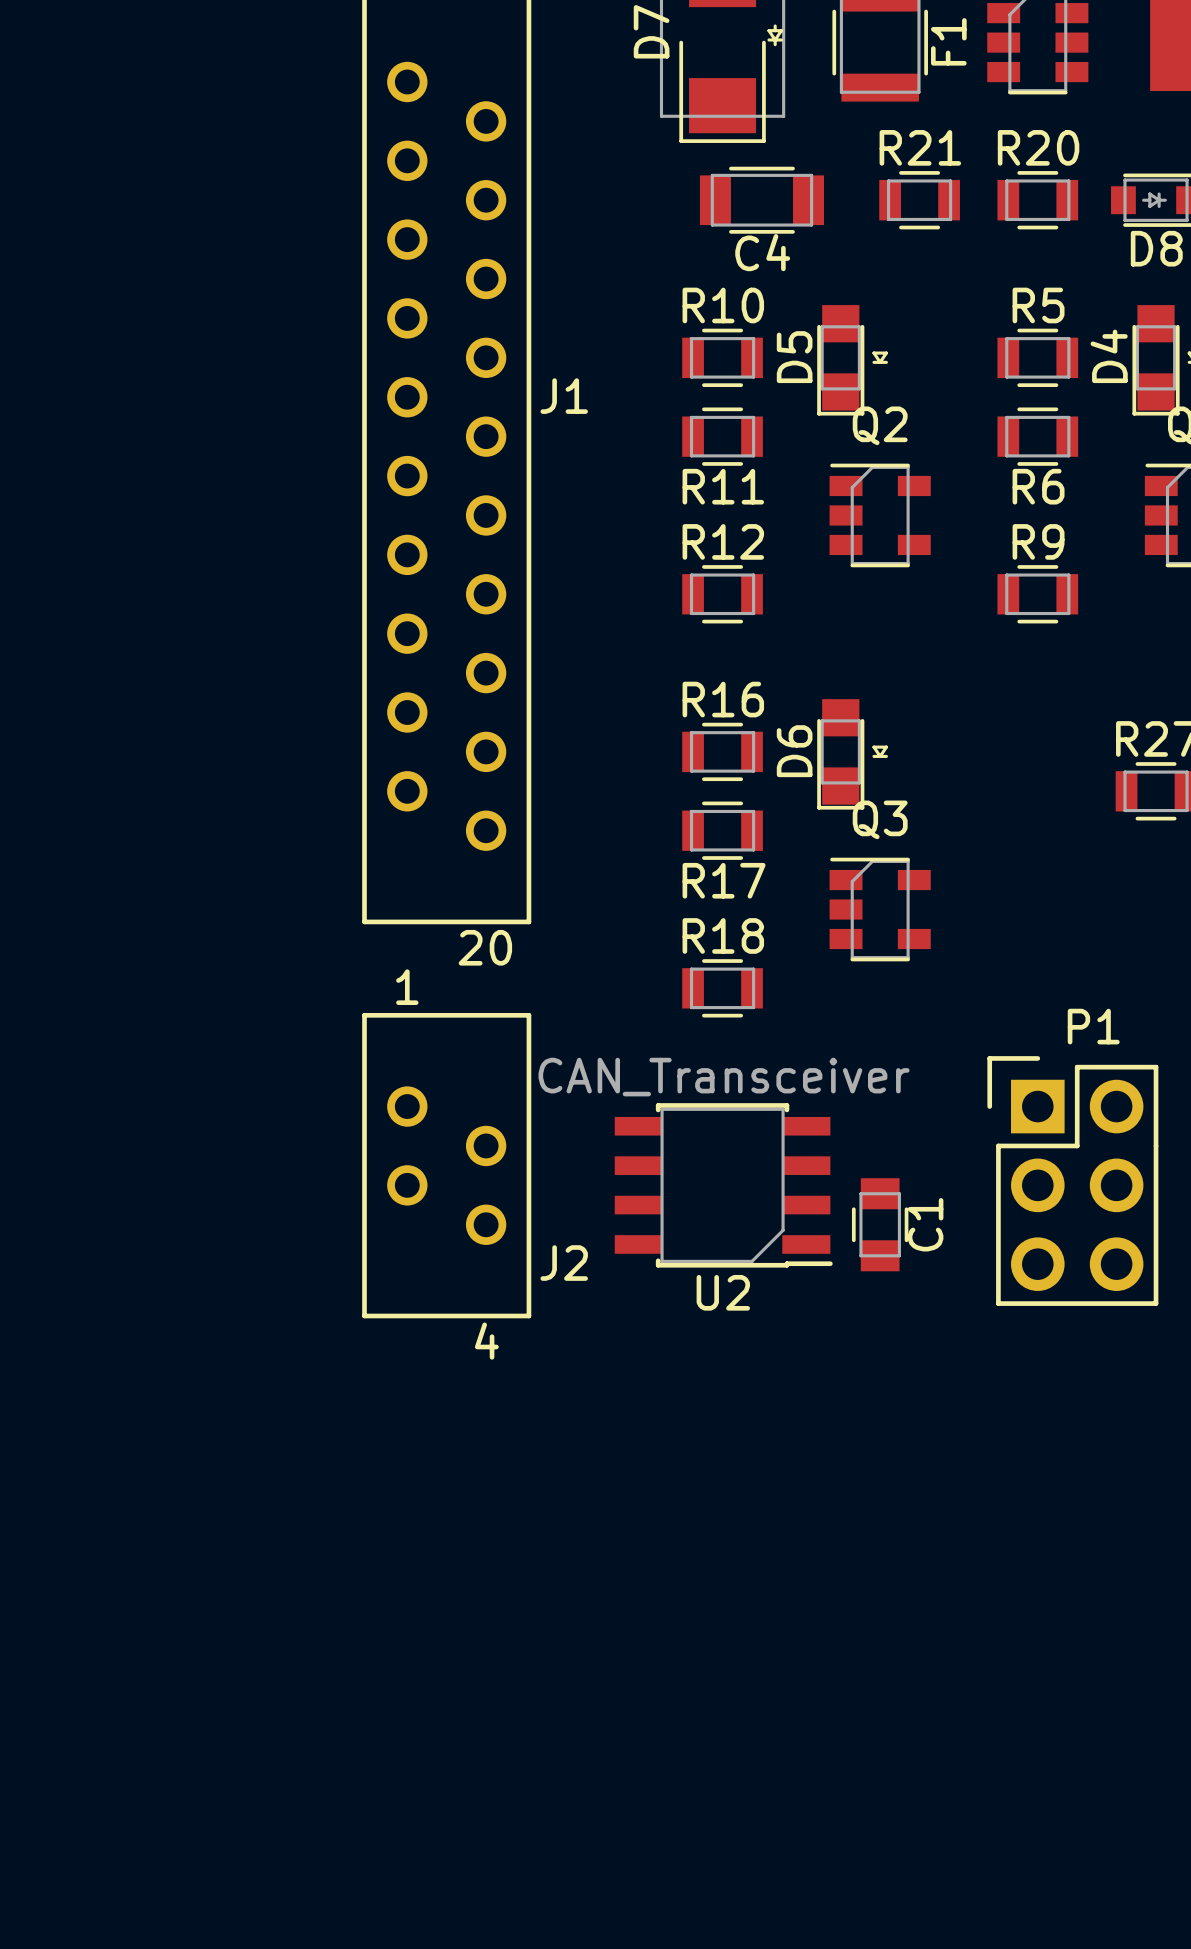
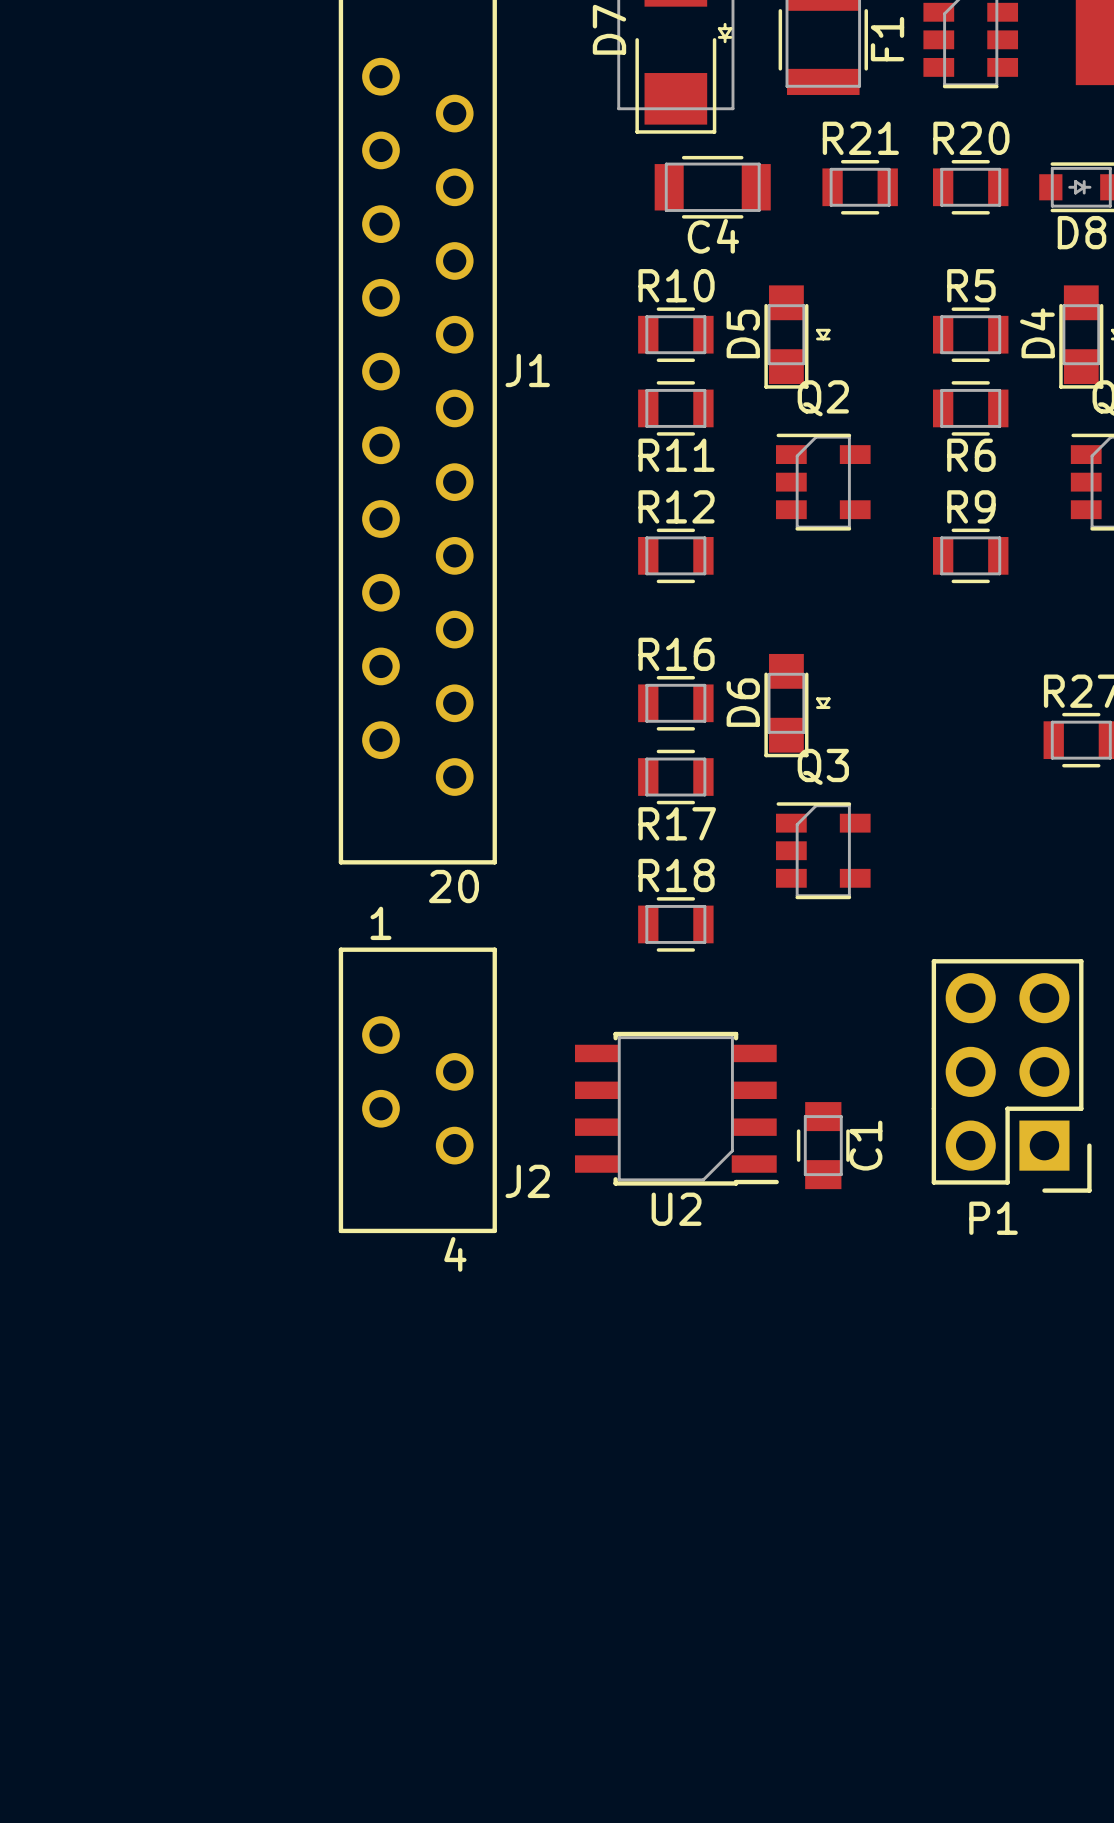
U2 value: CAN_Transceiver (724, 1077) -> none
P1 rotation: 0° (1072, 1181) -> 180° (1011, 1075)

